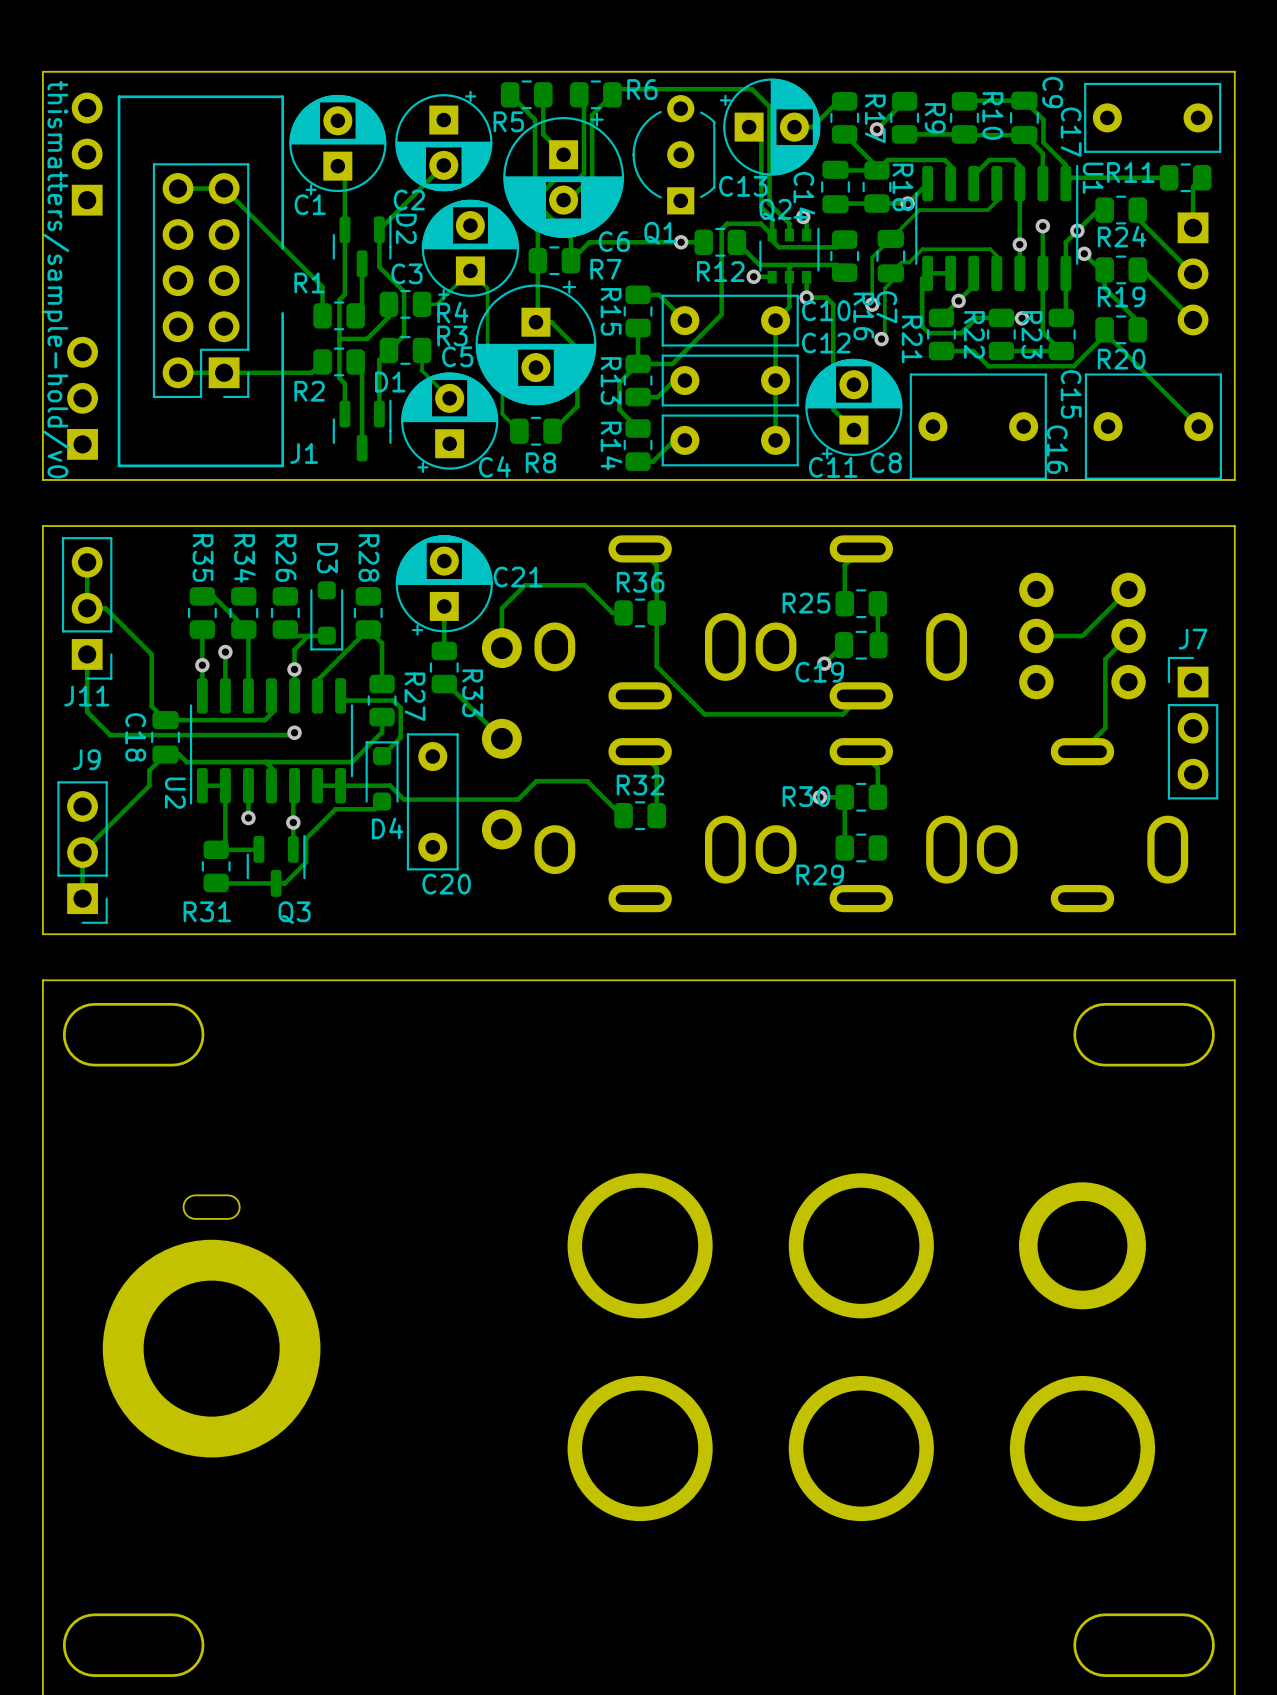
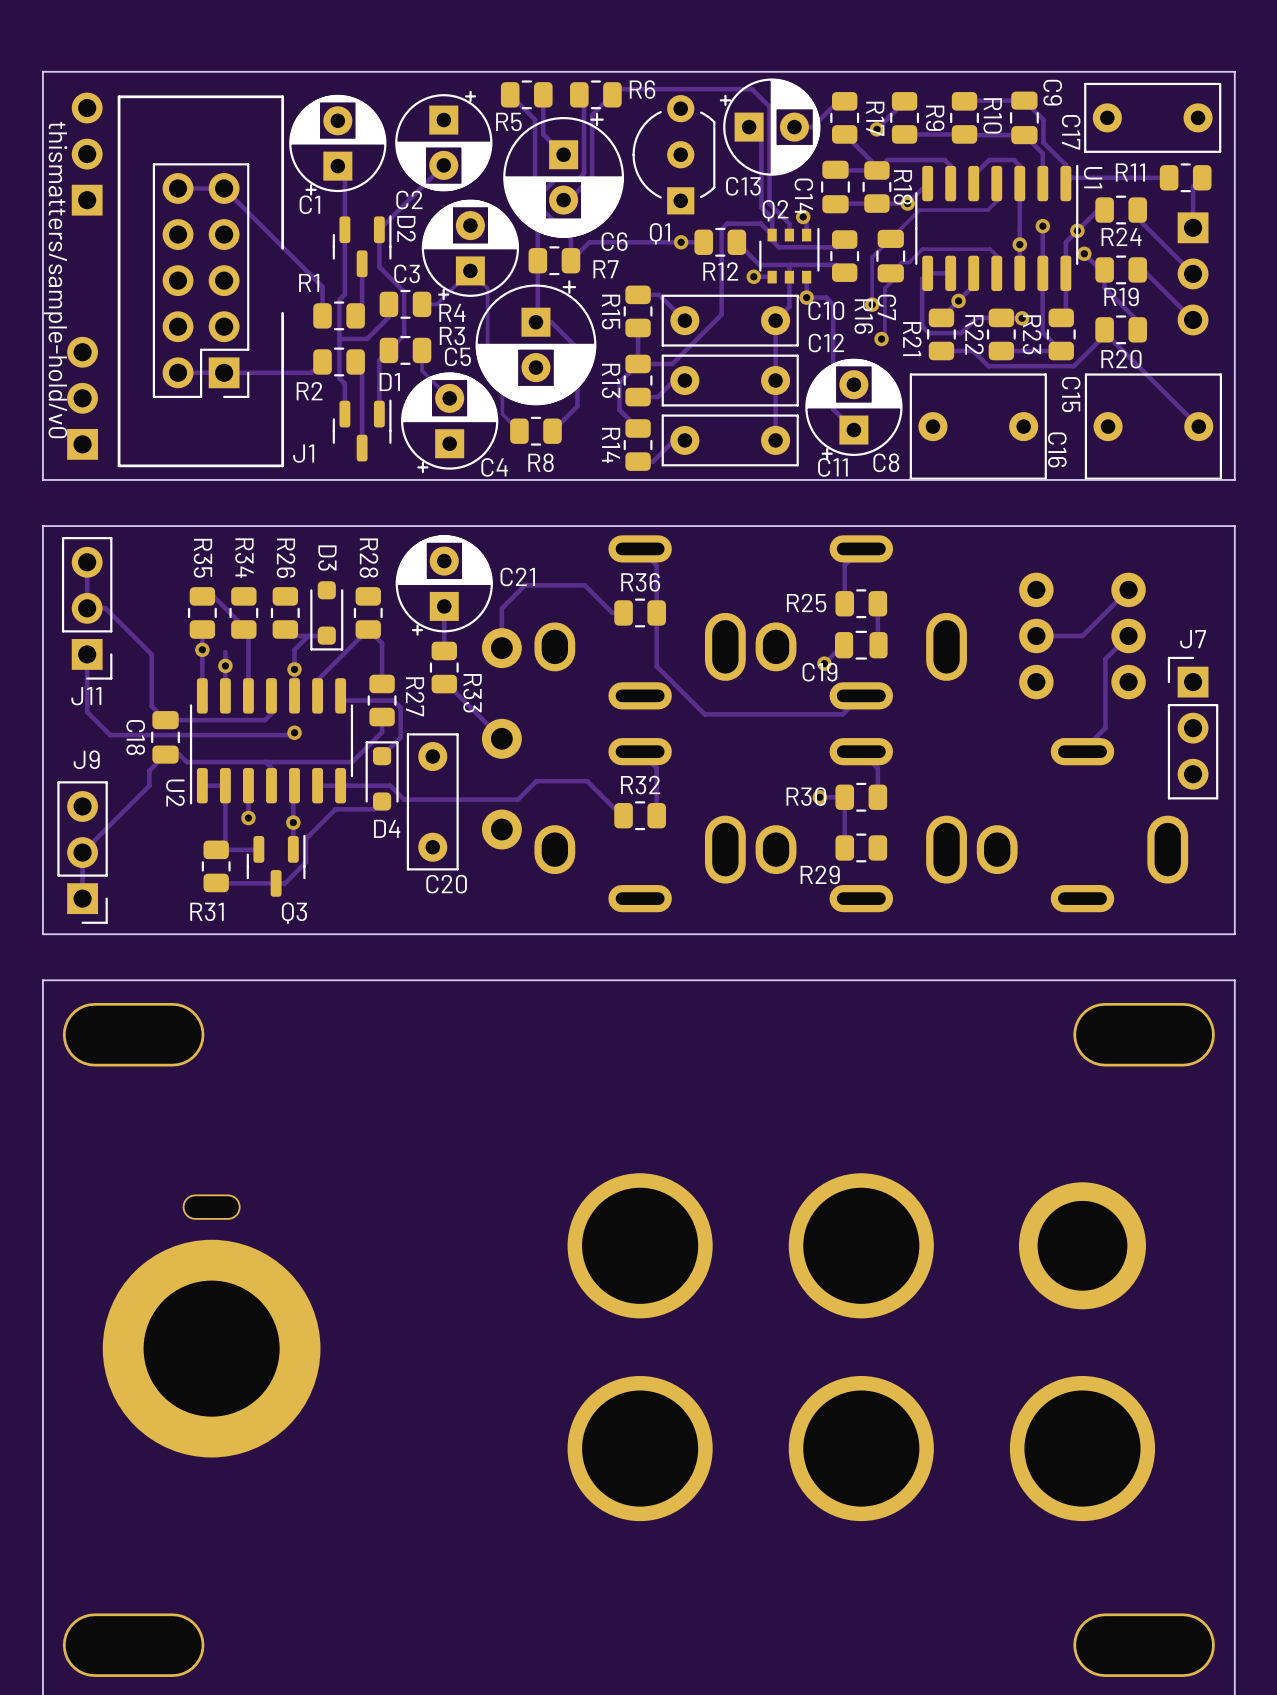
via: none -> (202, 649)
via position: (225, 652) -> (225, 665)
via: (202, 665) -> none

